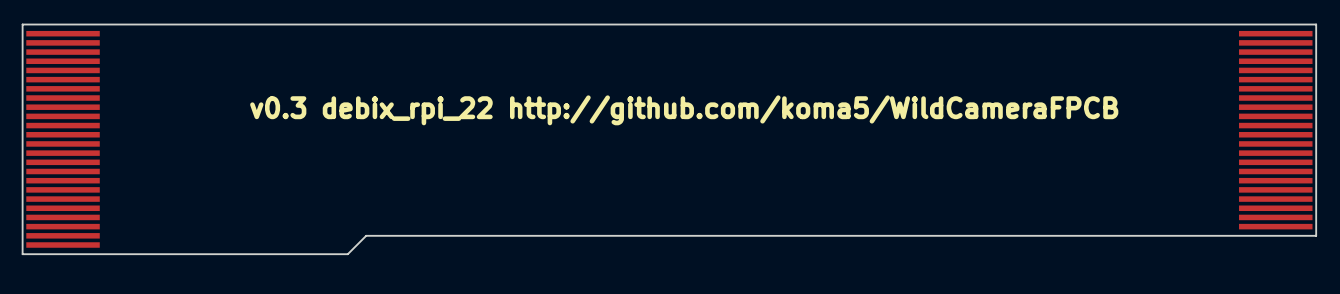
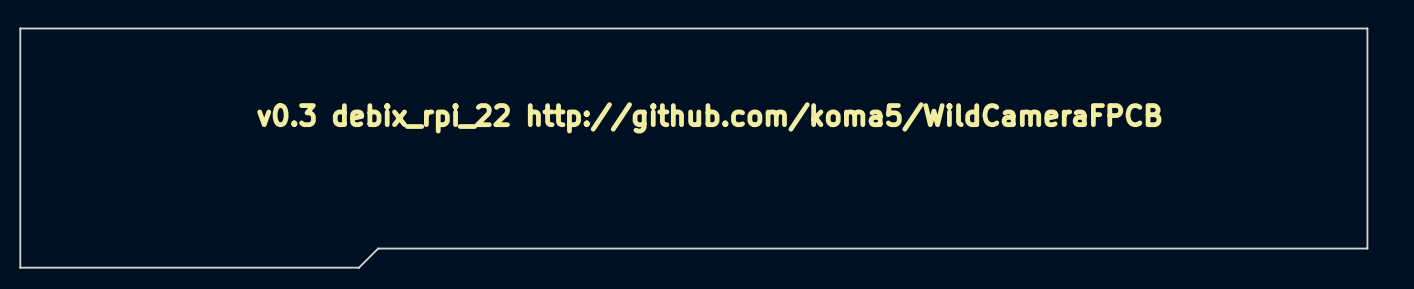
part: (1275, 130) -> none
part: (63, 139) -> none

